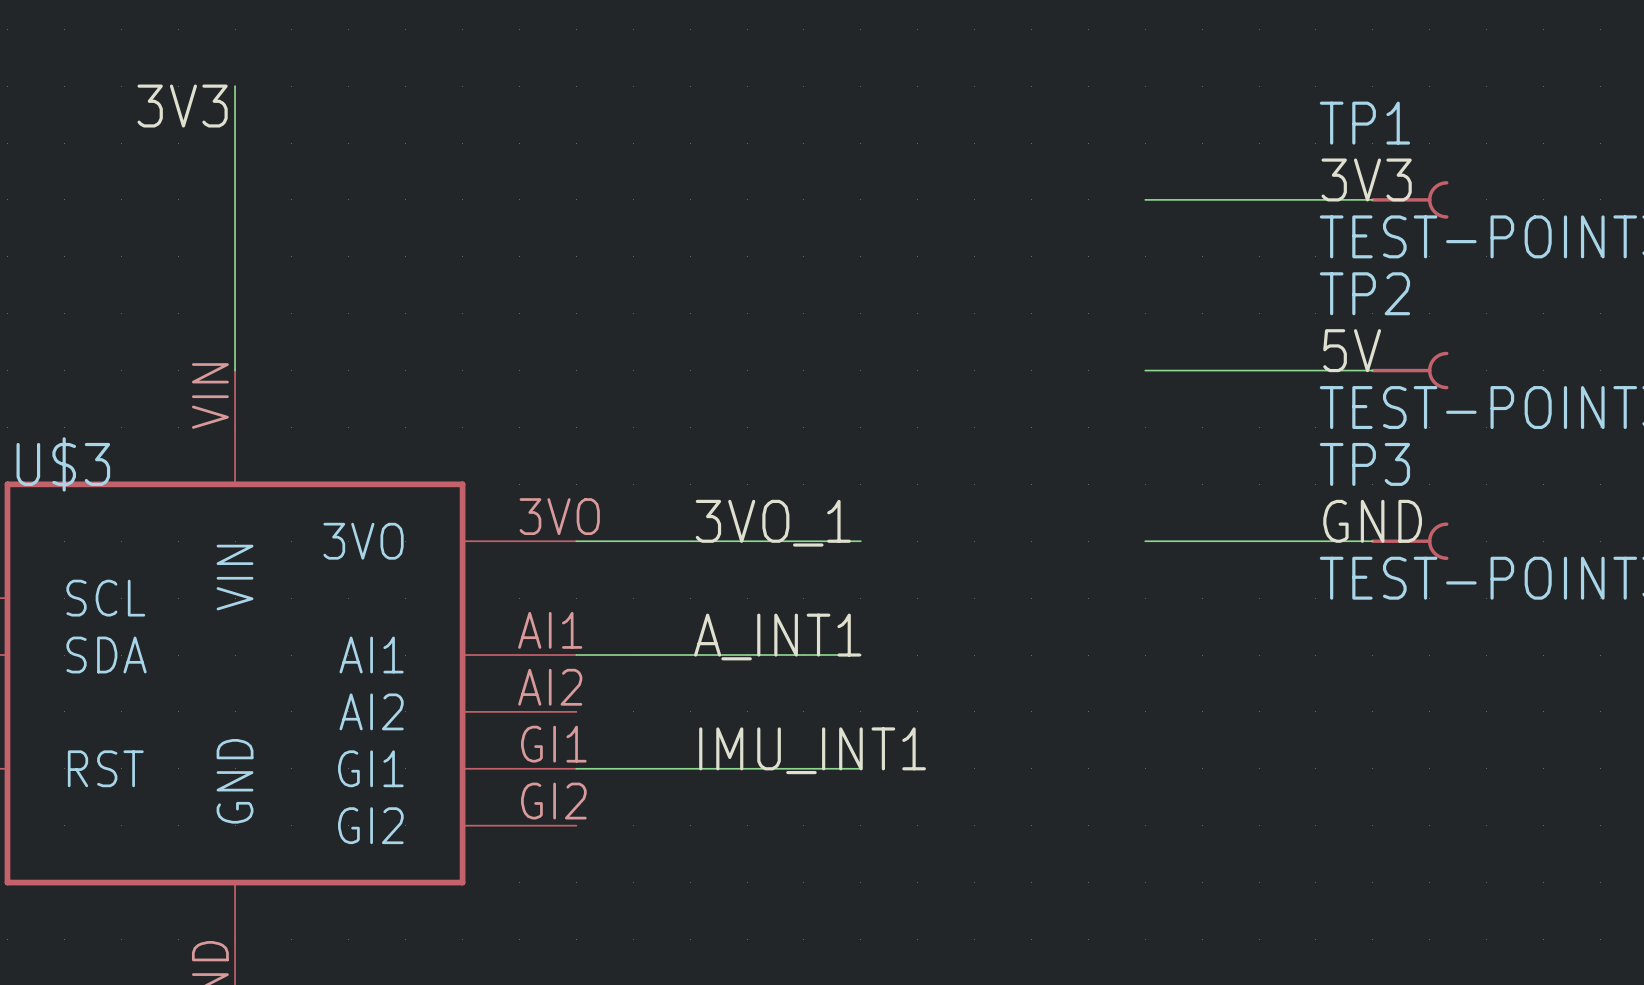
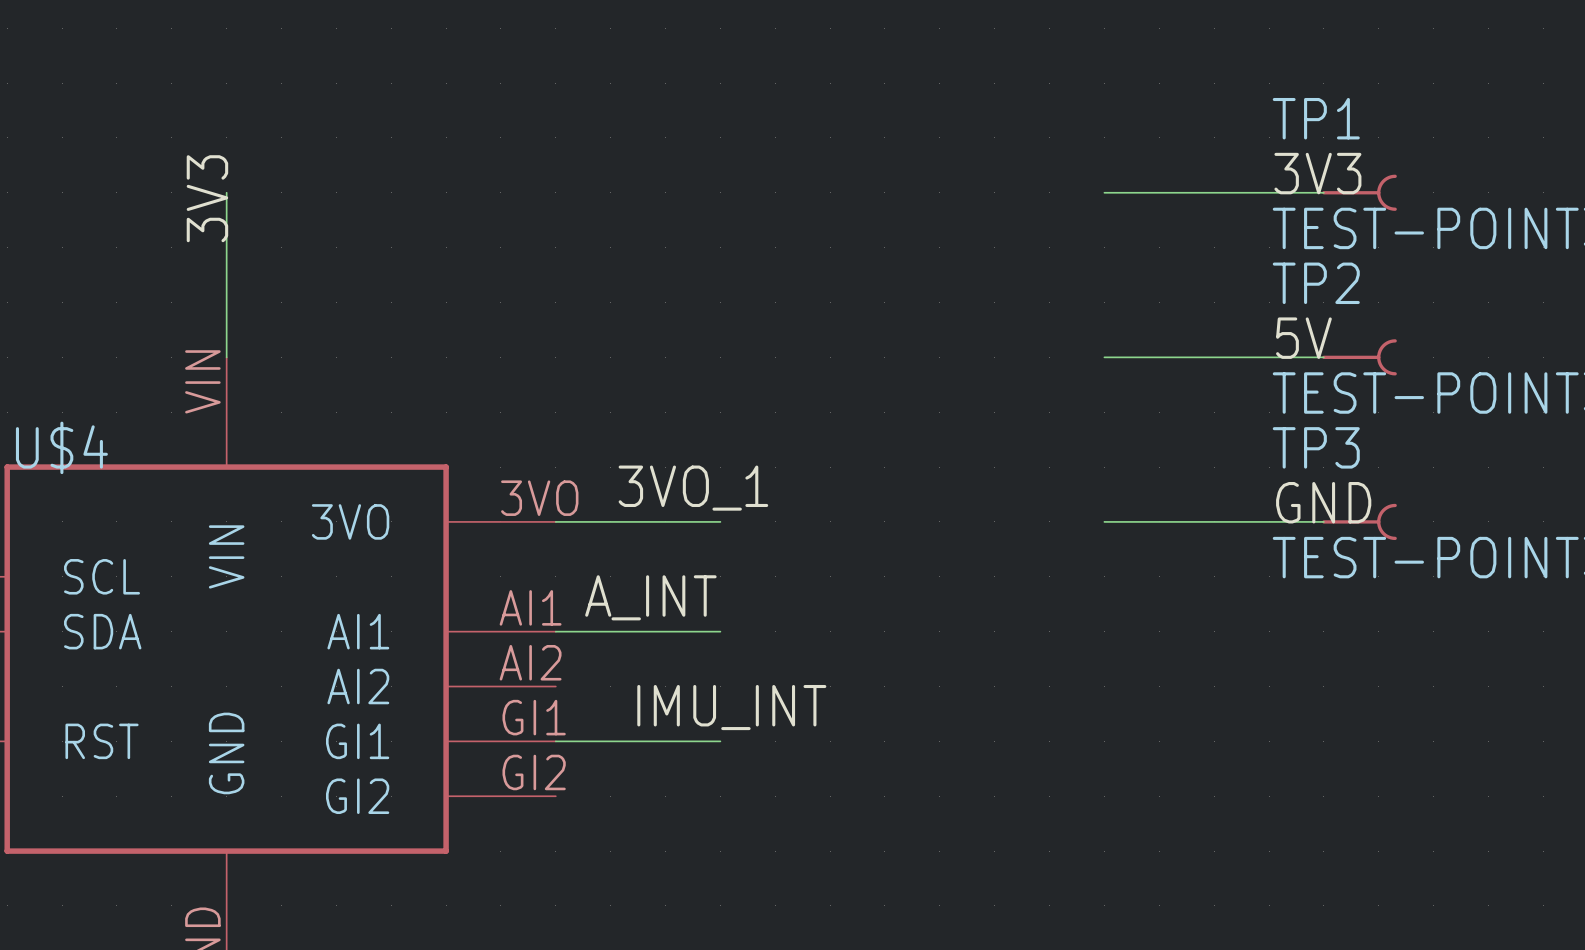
wire: (235, 86) (235, 199) -> none
label rotation: 0° (182, 106) -> 90° counterclockwise (207, 198)
U$3 name: U$3 (63, 464) -> U$4 (61, 447)
label position: 3VO_1 (773, 523) -> 3VO_1 (693, 488)
wire: (747, 541) (860, 541) -> none
label: A_INT1 (777, 636) -> A_INT (650, 597)
wire: (747, 655) (860, 655) -> none
label: IMU_INT1 (812, 750) -> IMU_INT (731, 707)
wire: (747, 768) (860, 768) -> none

